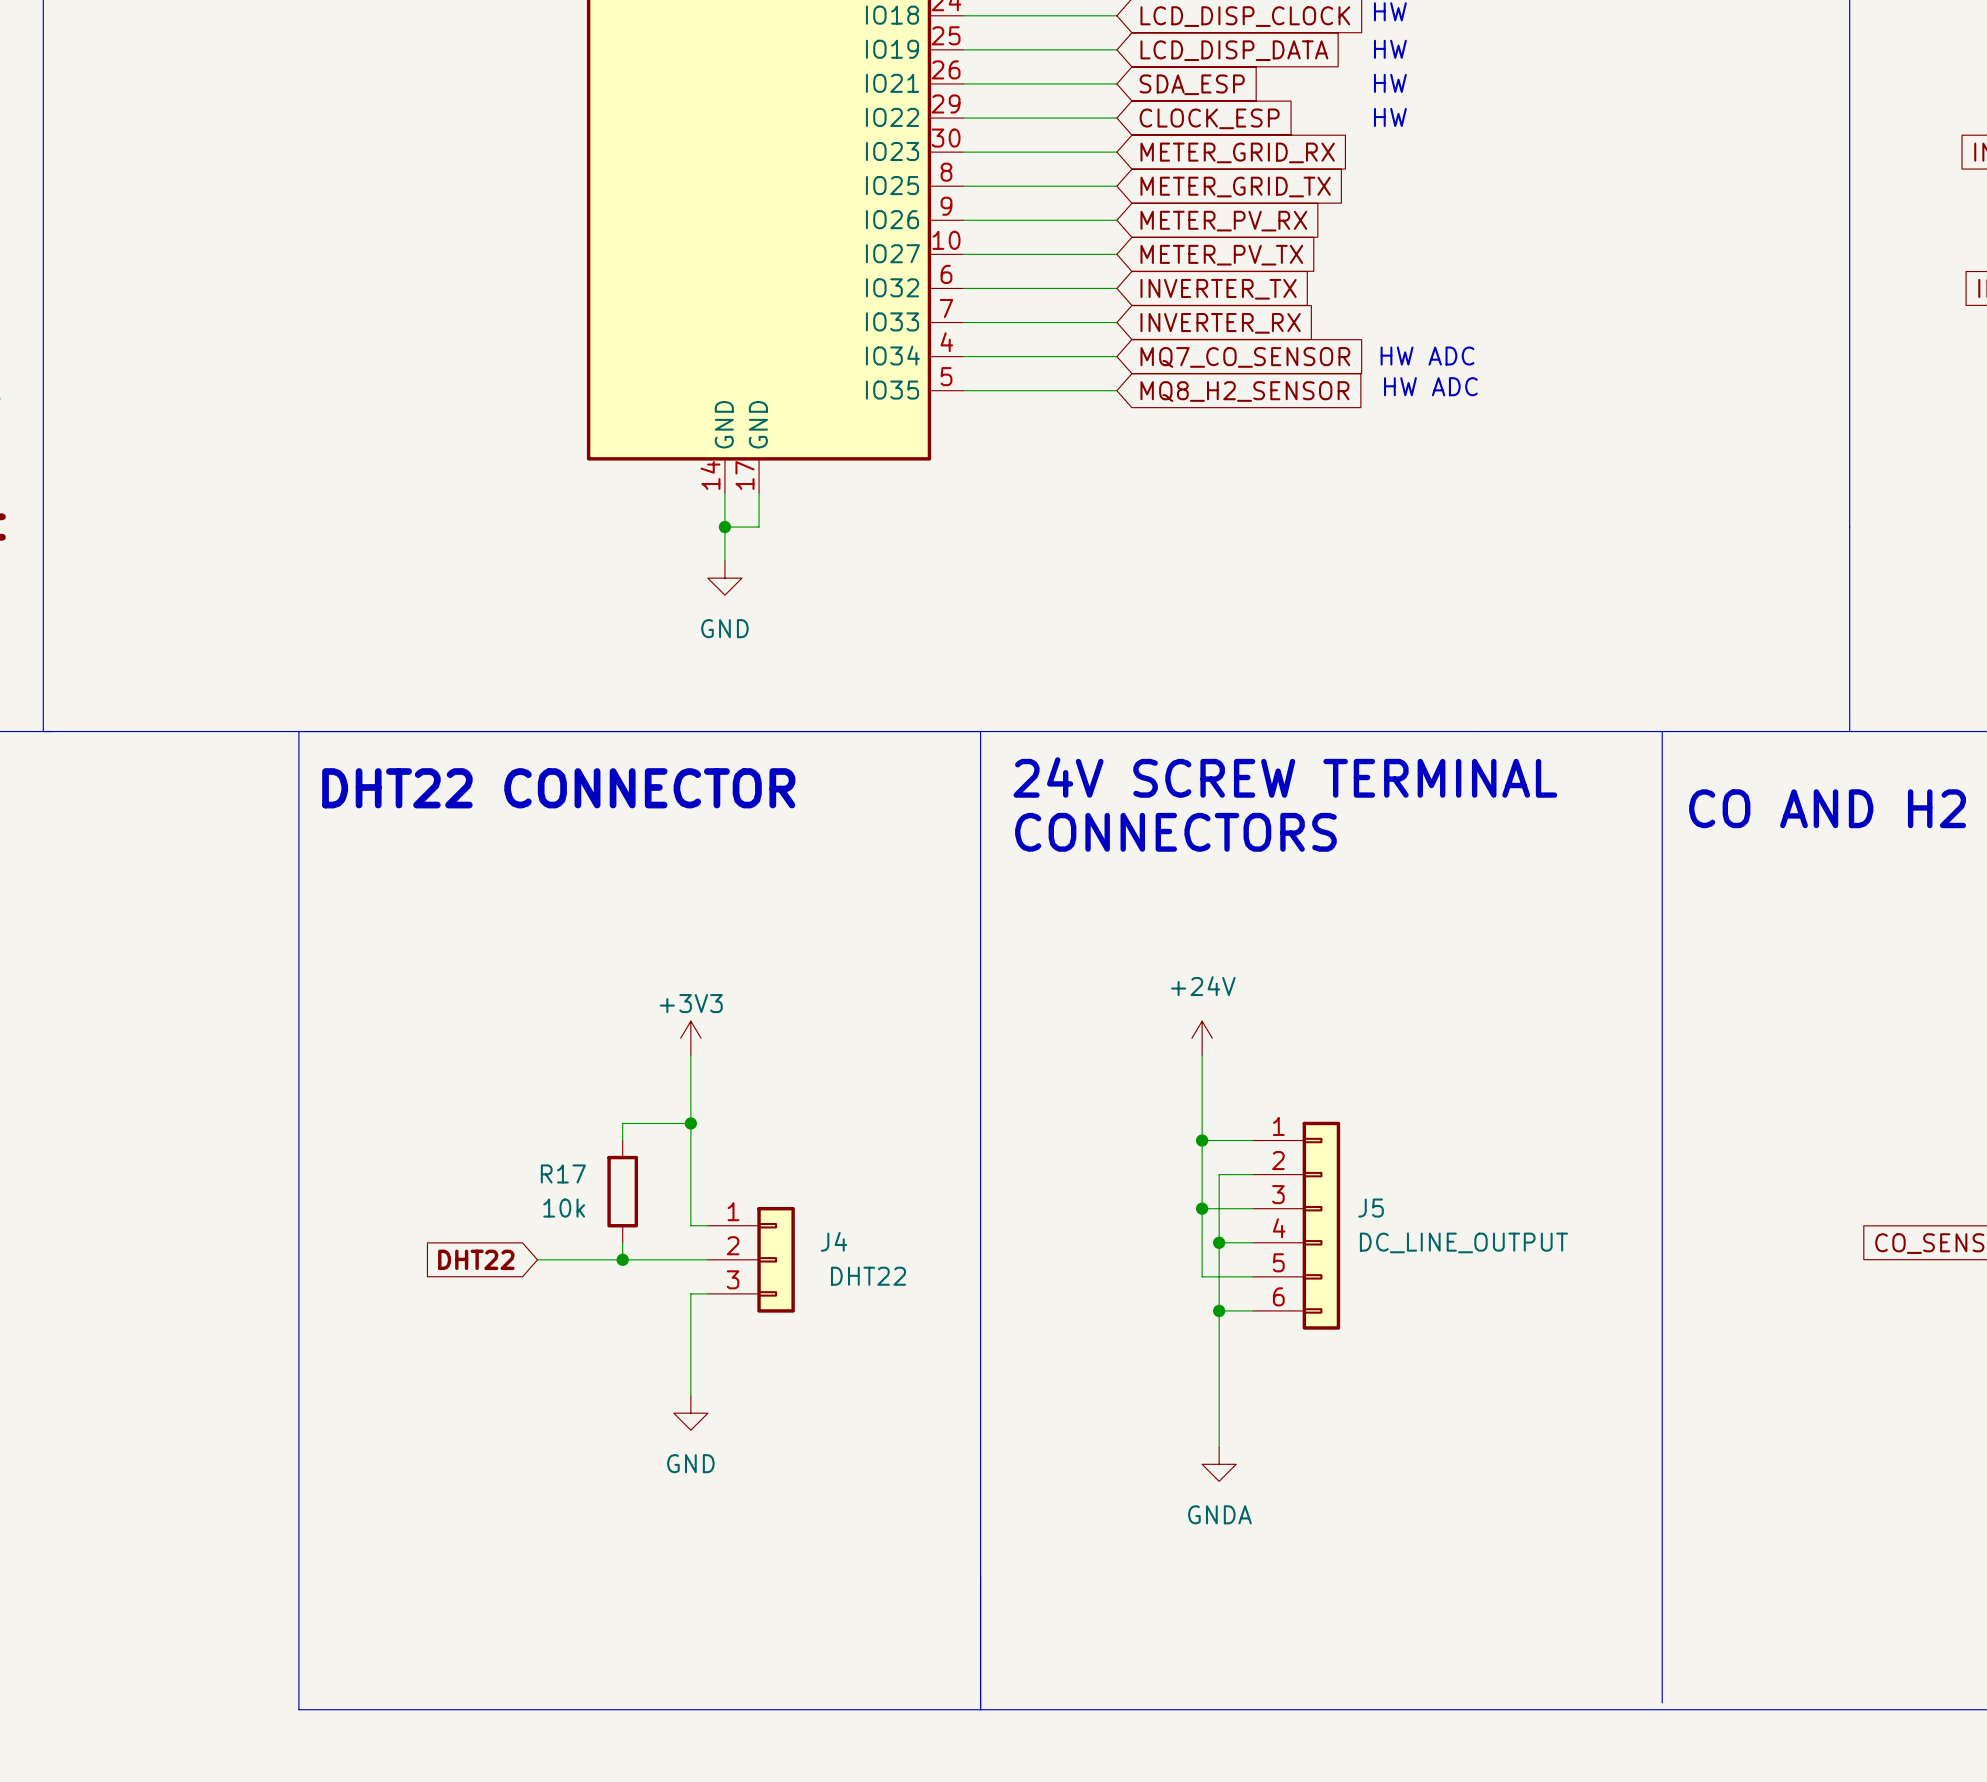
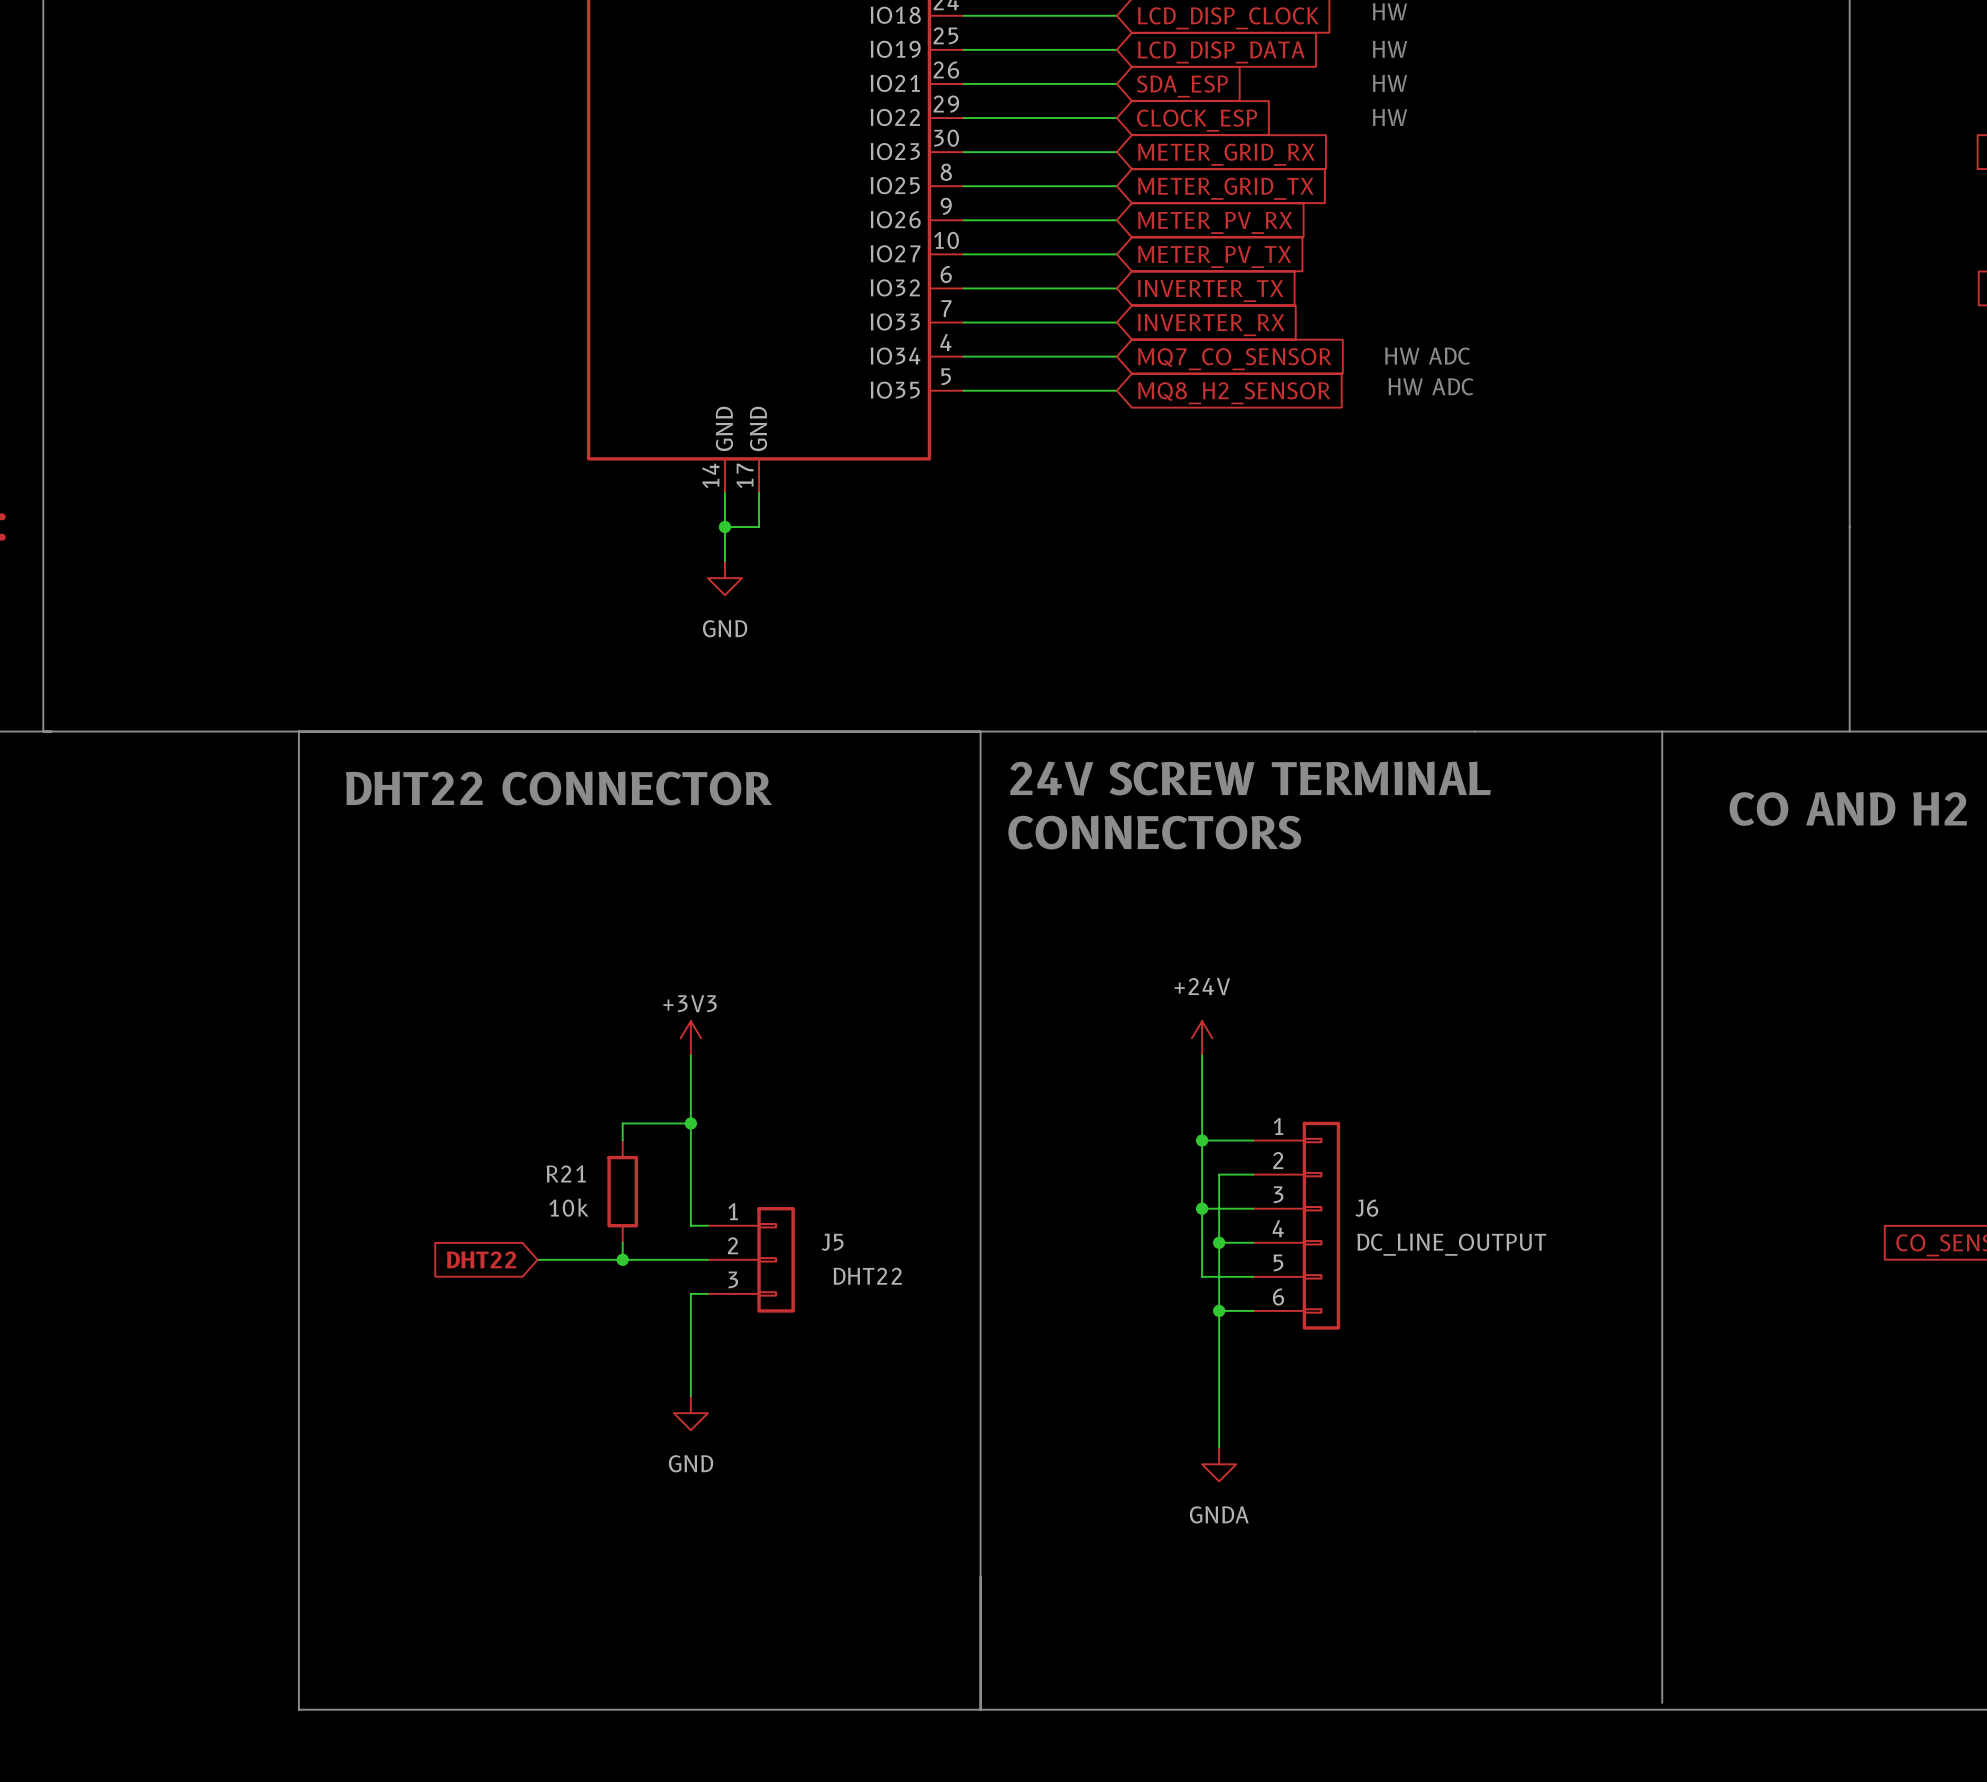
R17 name: R17 (563, 1173) -> R21 (566, 1173)
J5 name: J5 (1371, 1208) -> J6 (1366, 1208)
J4 name: J4 (834, 1241) -> J5 (832, 1242)

